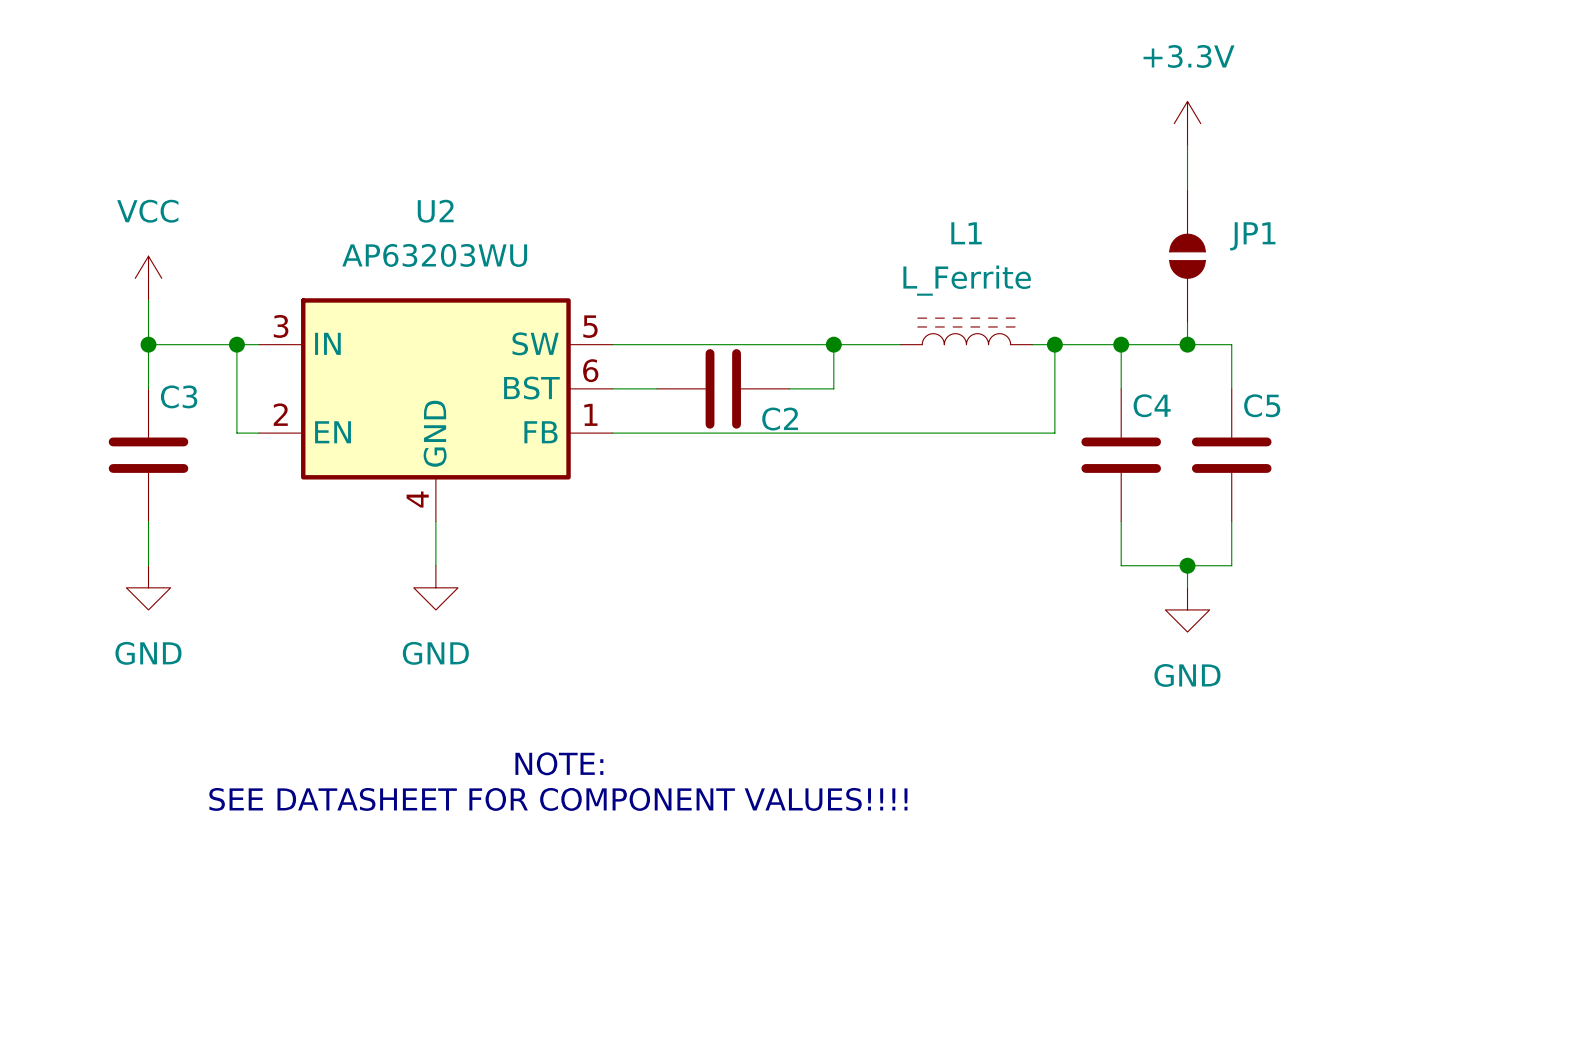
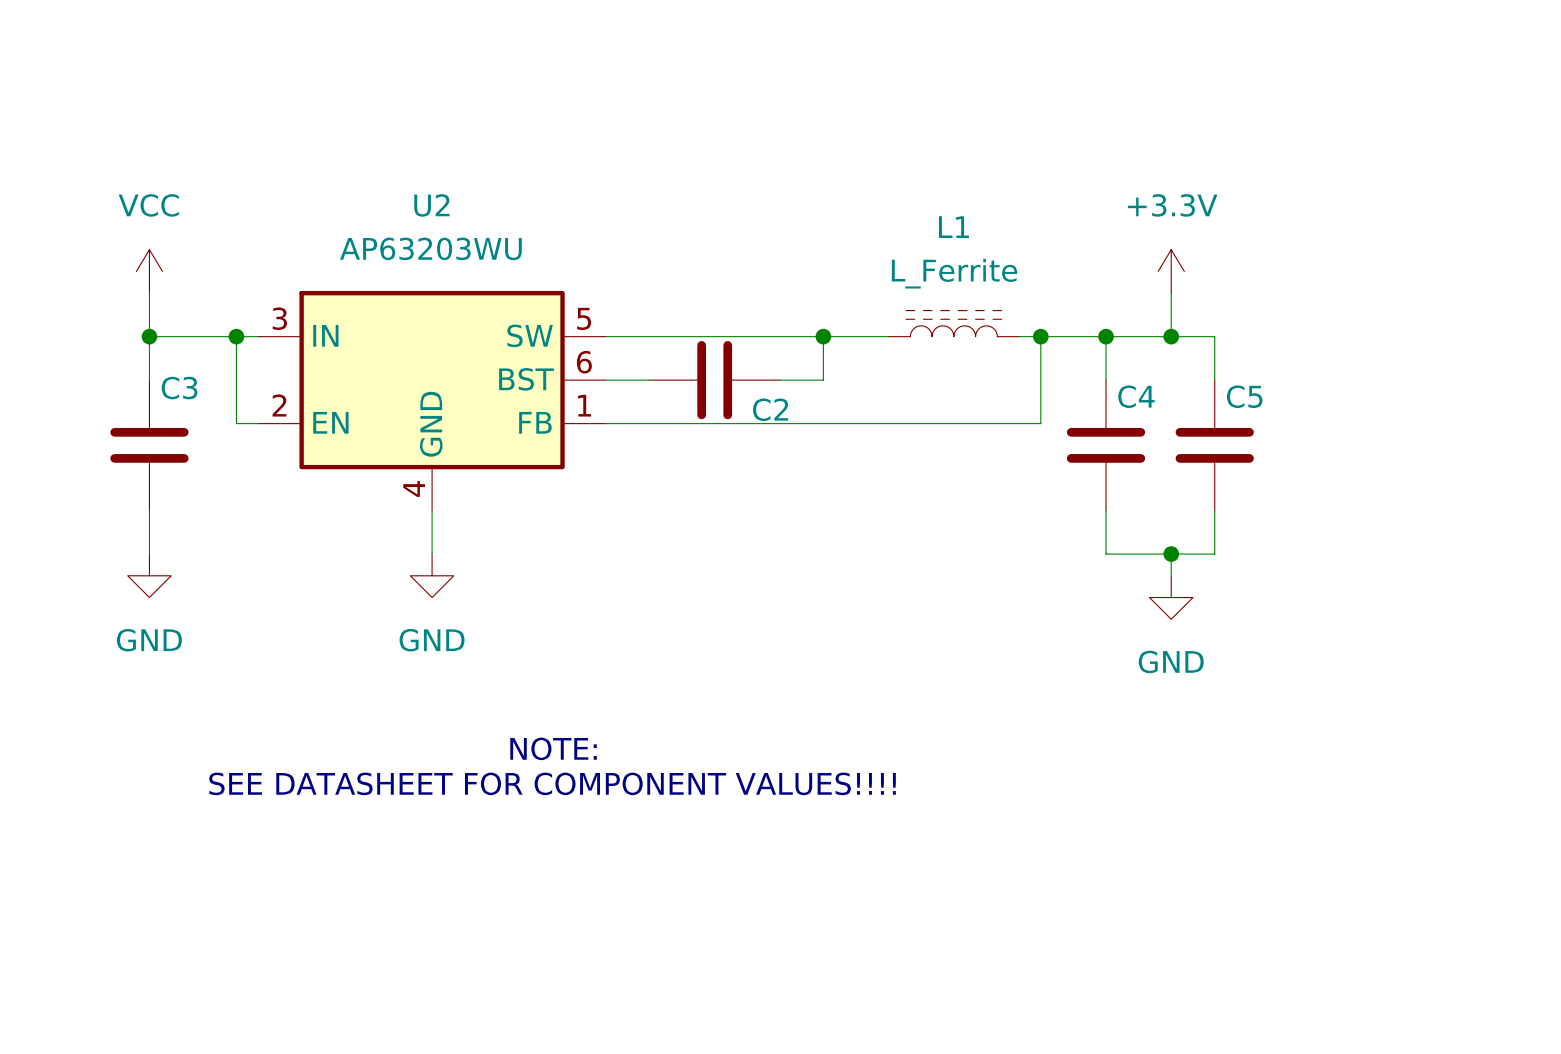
power symbol position: +3.3V (1187, 123) -> +3.3V (1171, 271)
wire: (1187, 145) (1187, 189) -> none
JP1: (1187, 256) -> none

